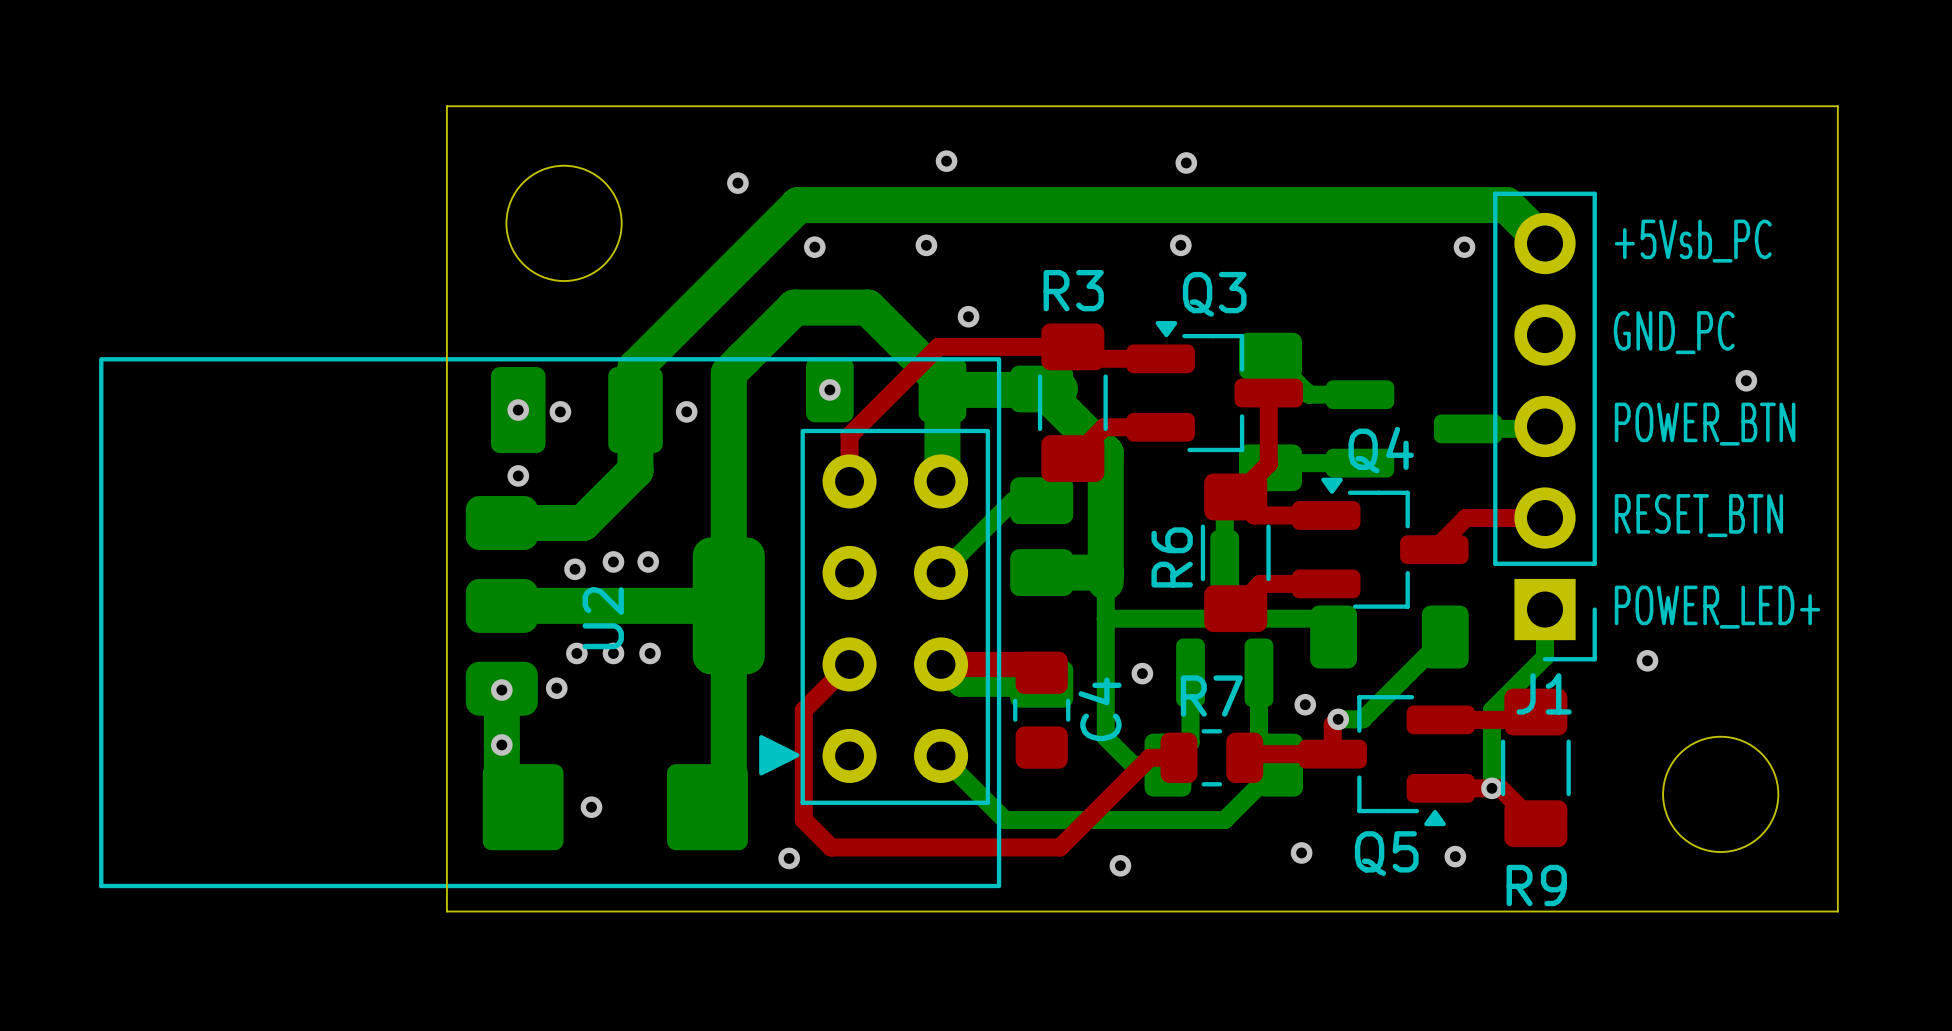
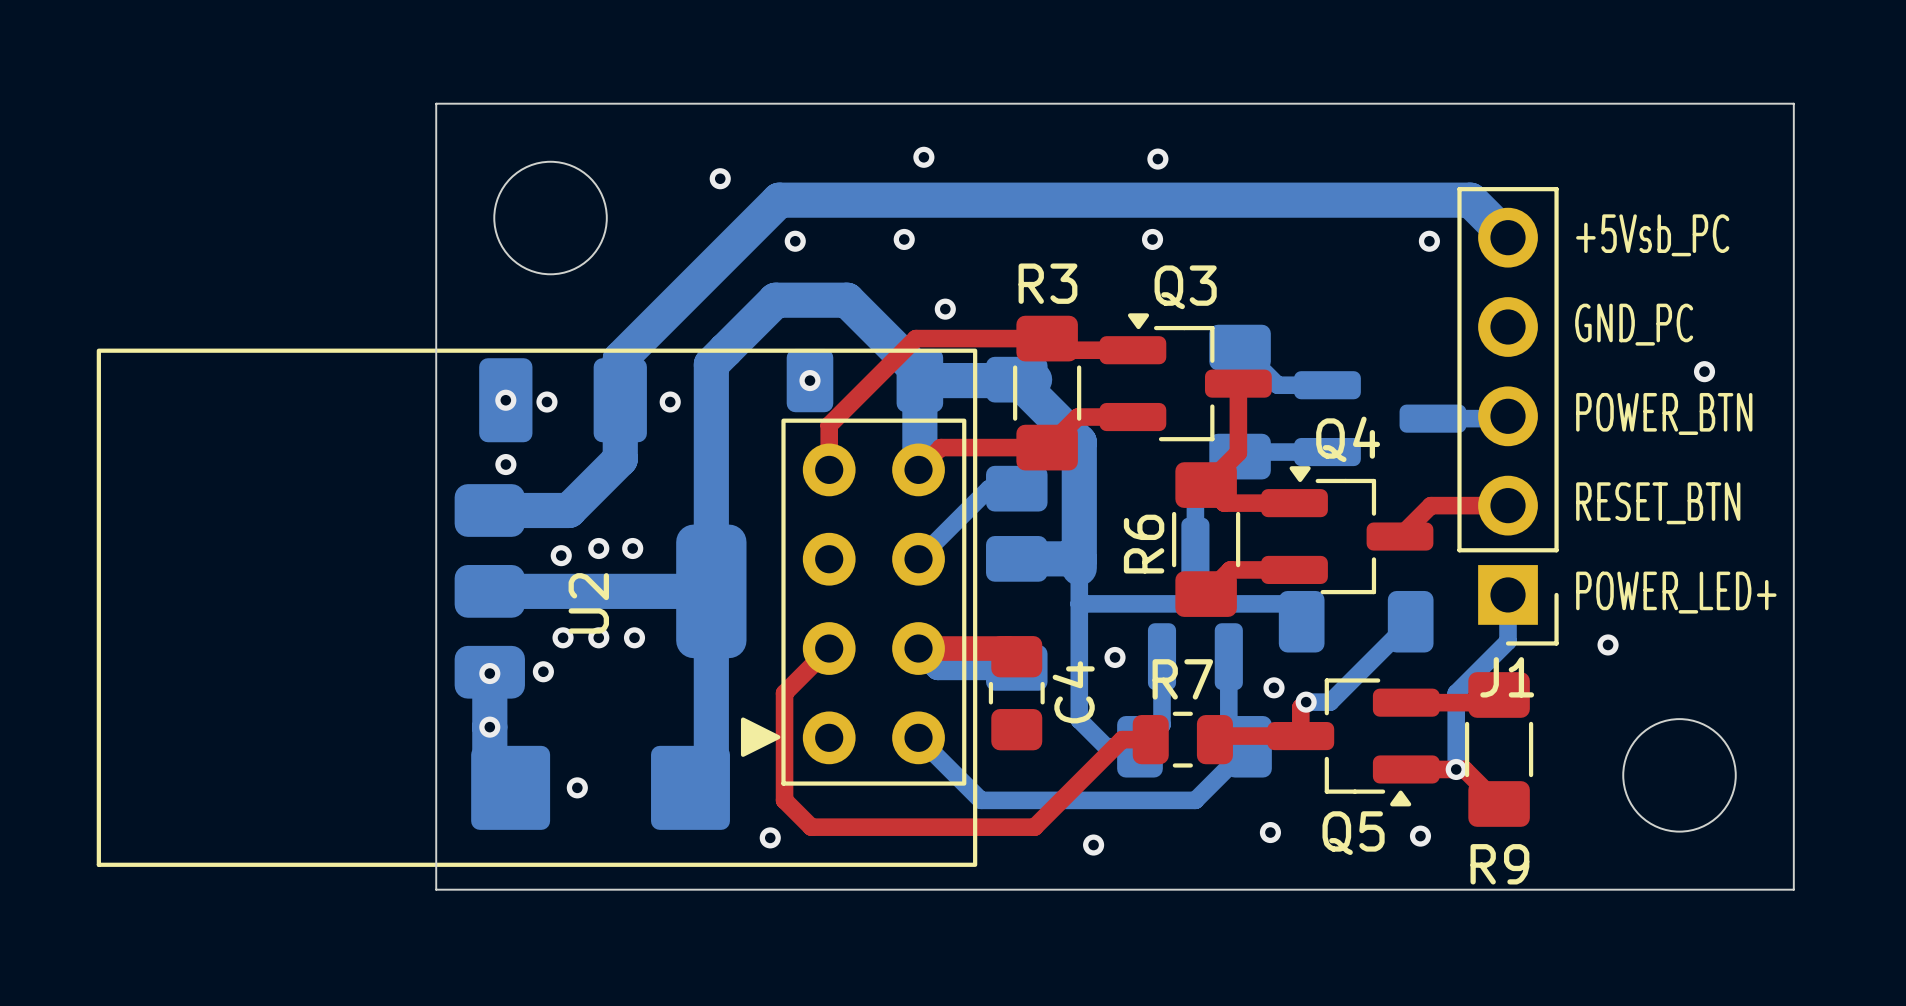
top track: none -> (1047, 447) (940, 447) (918, 469)

